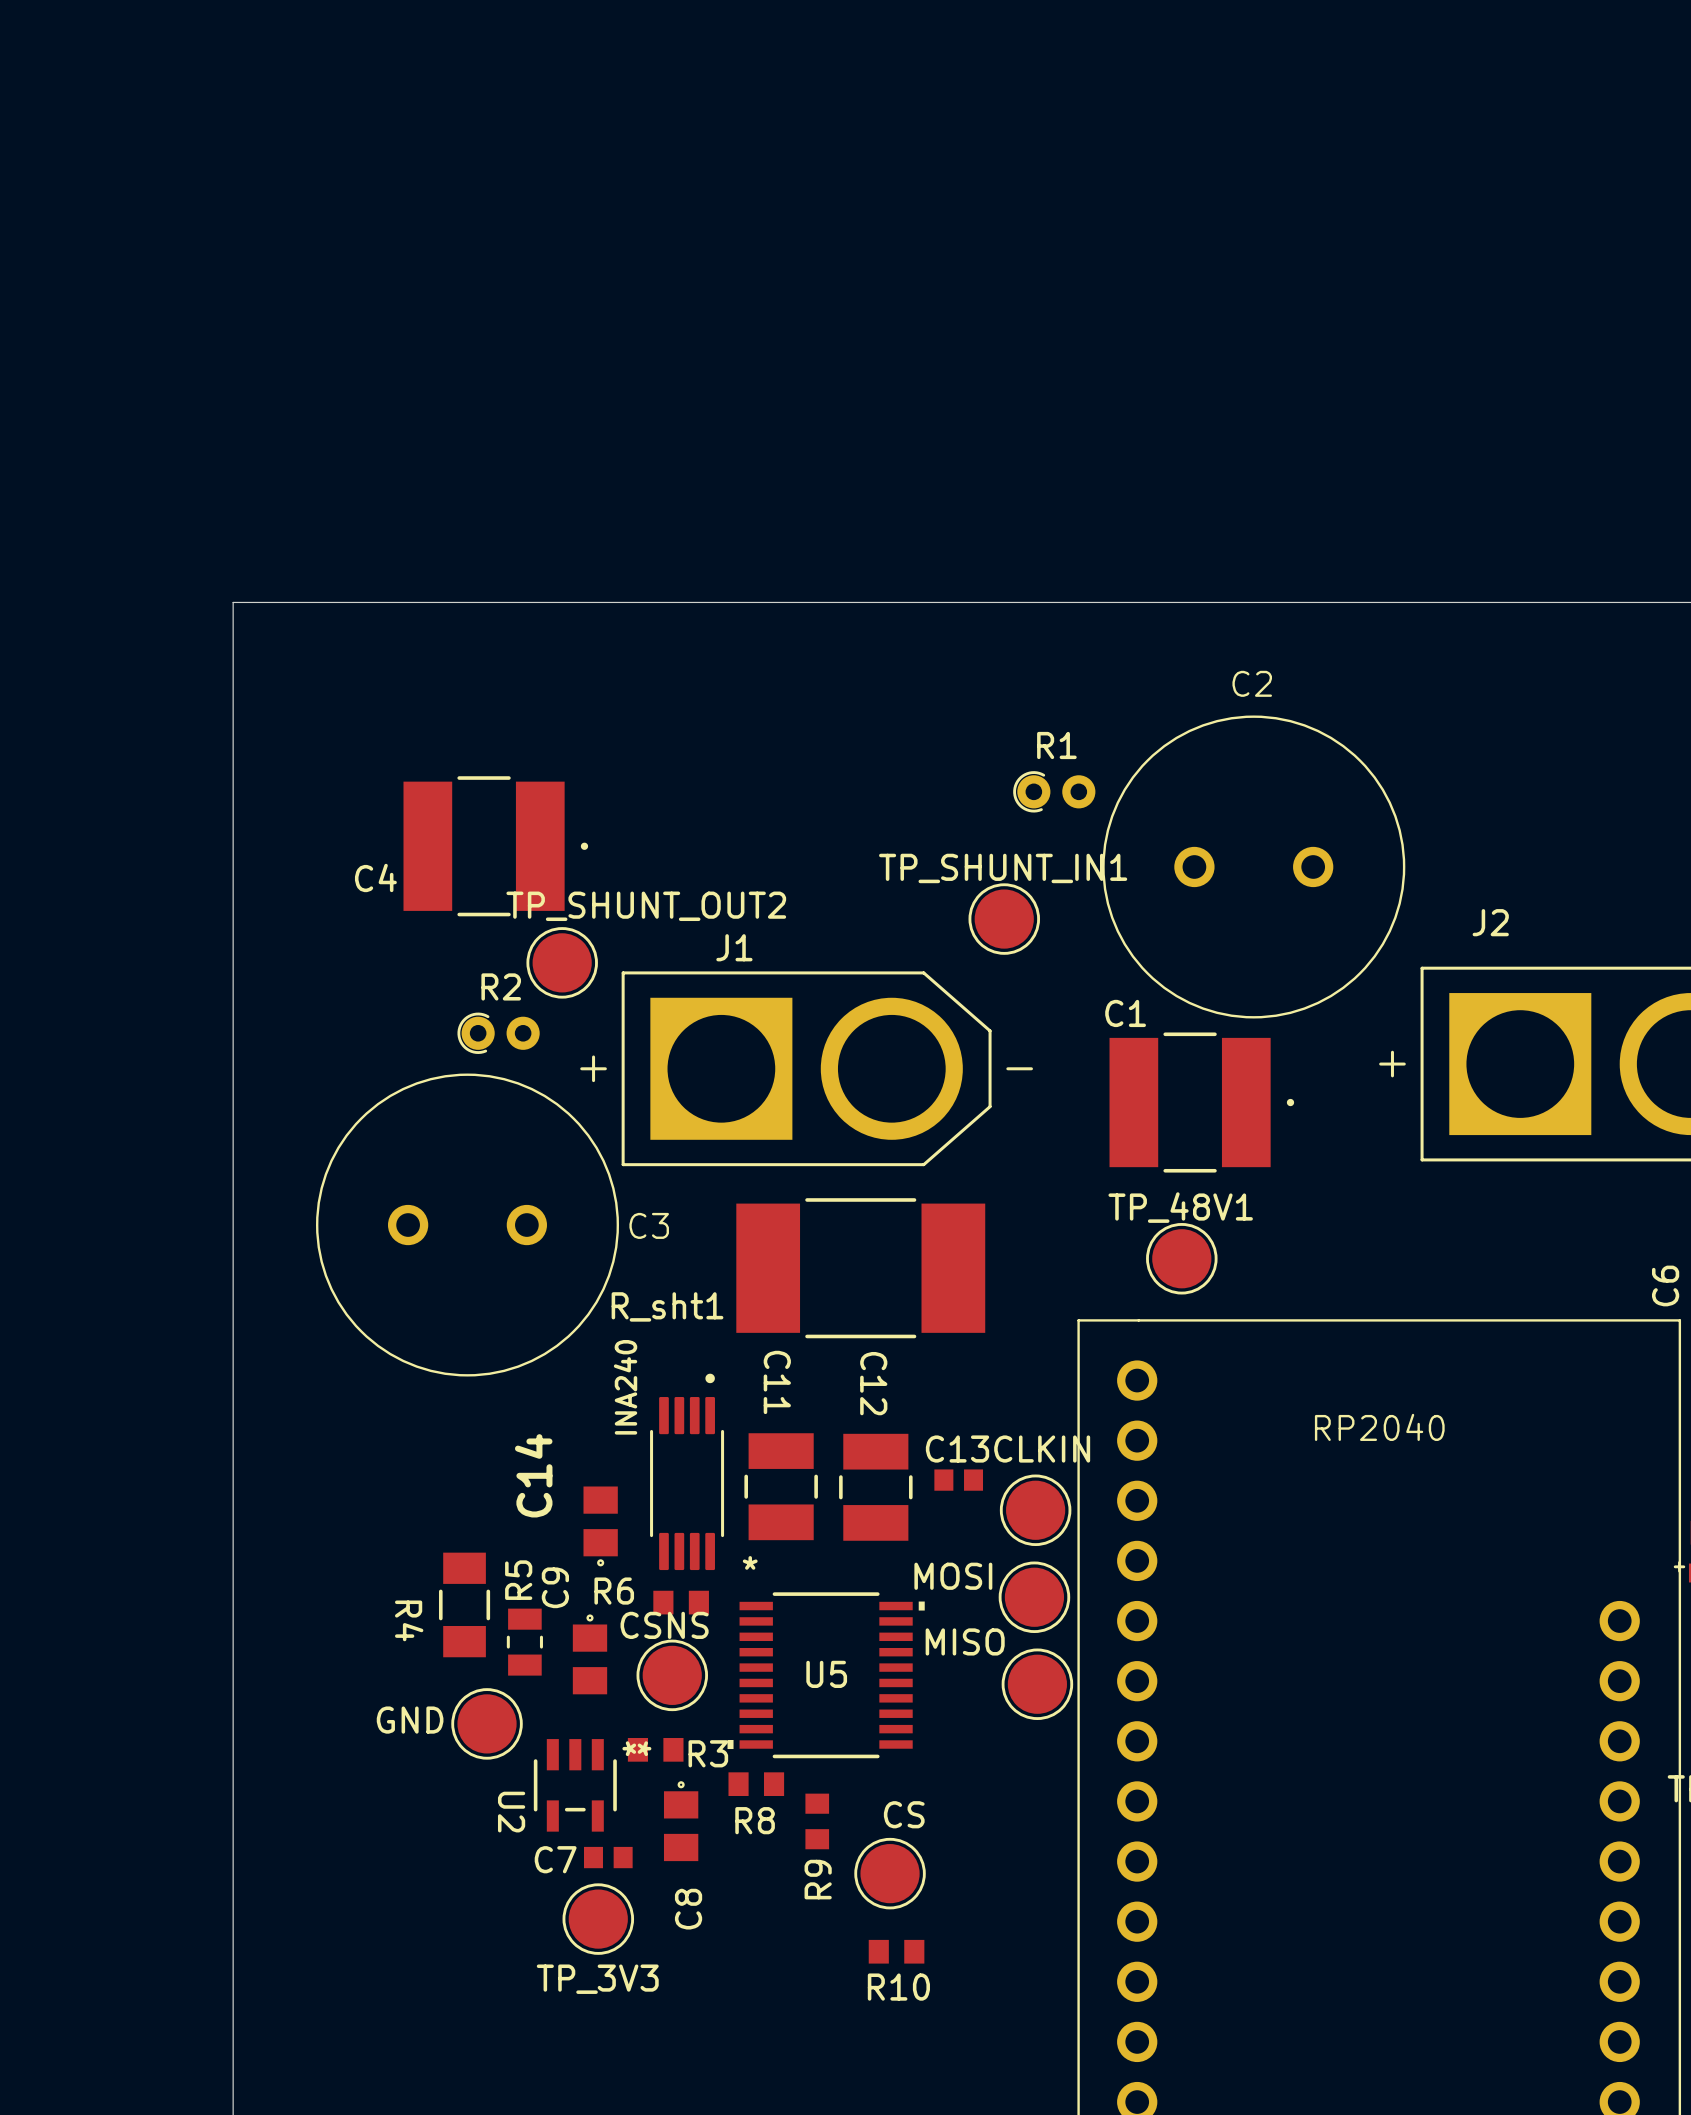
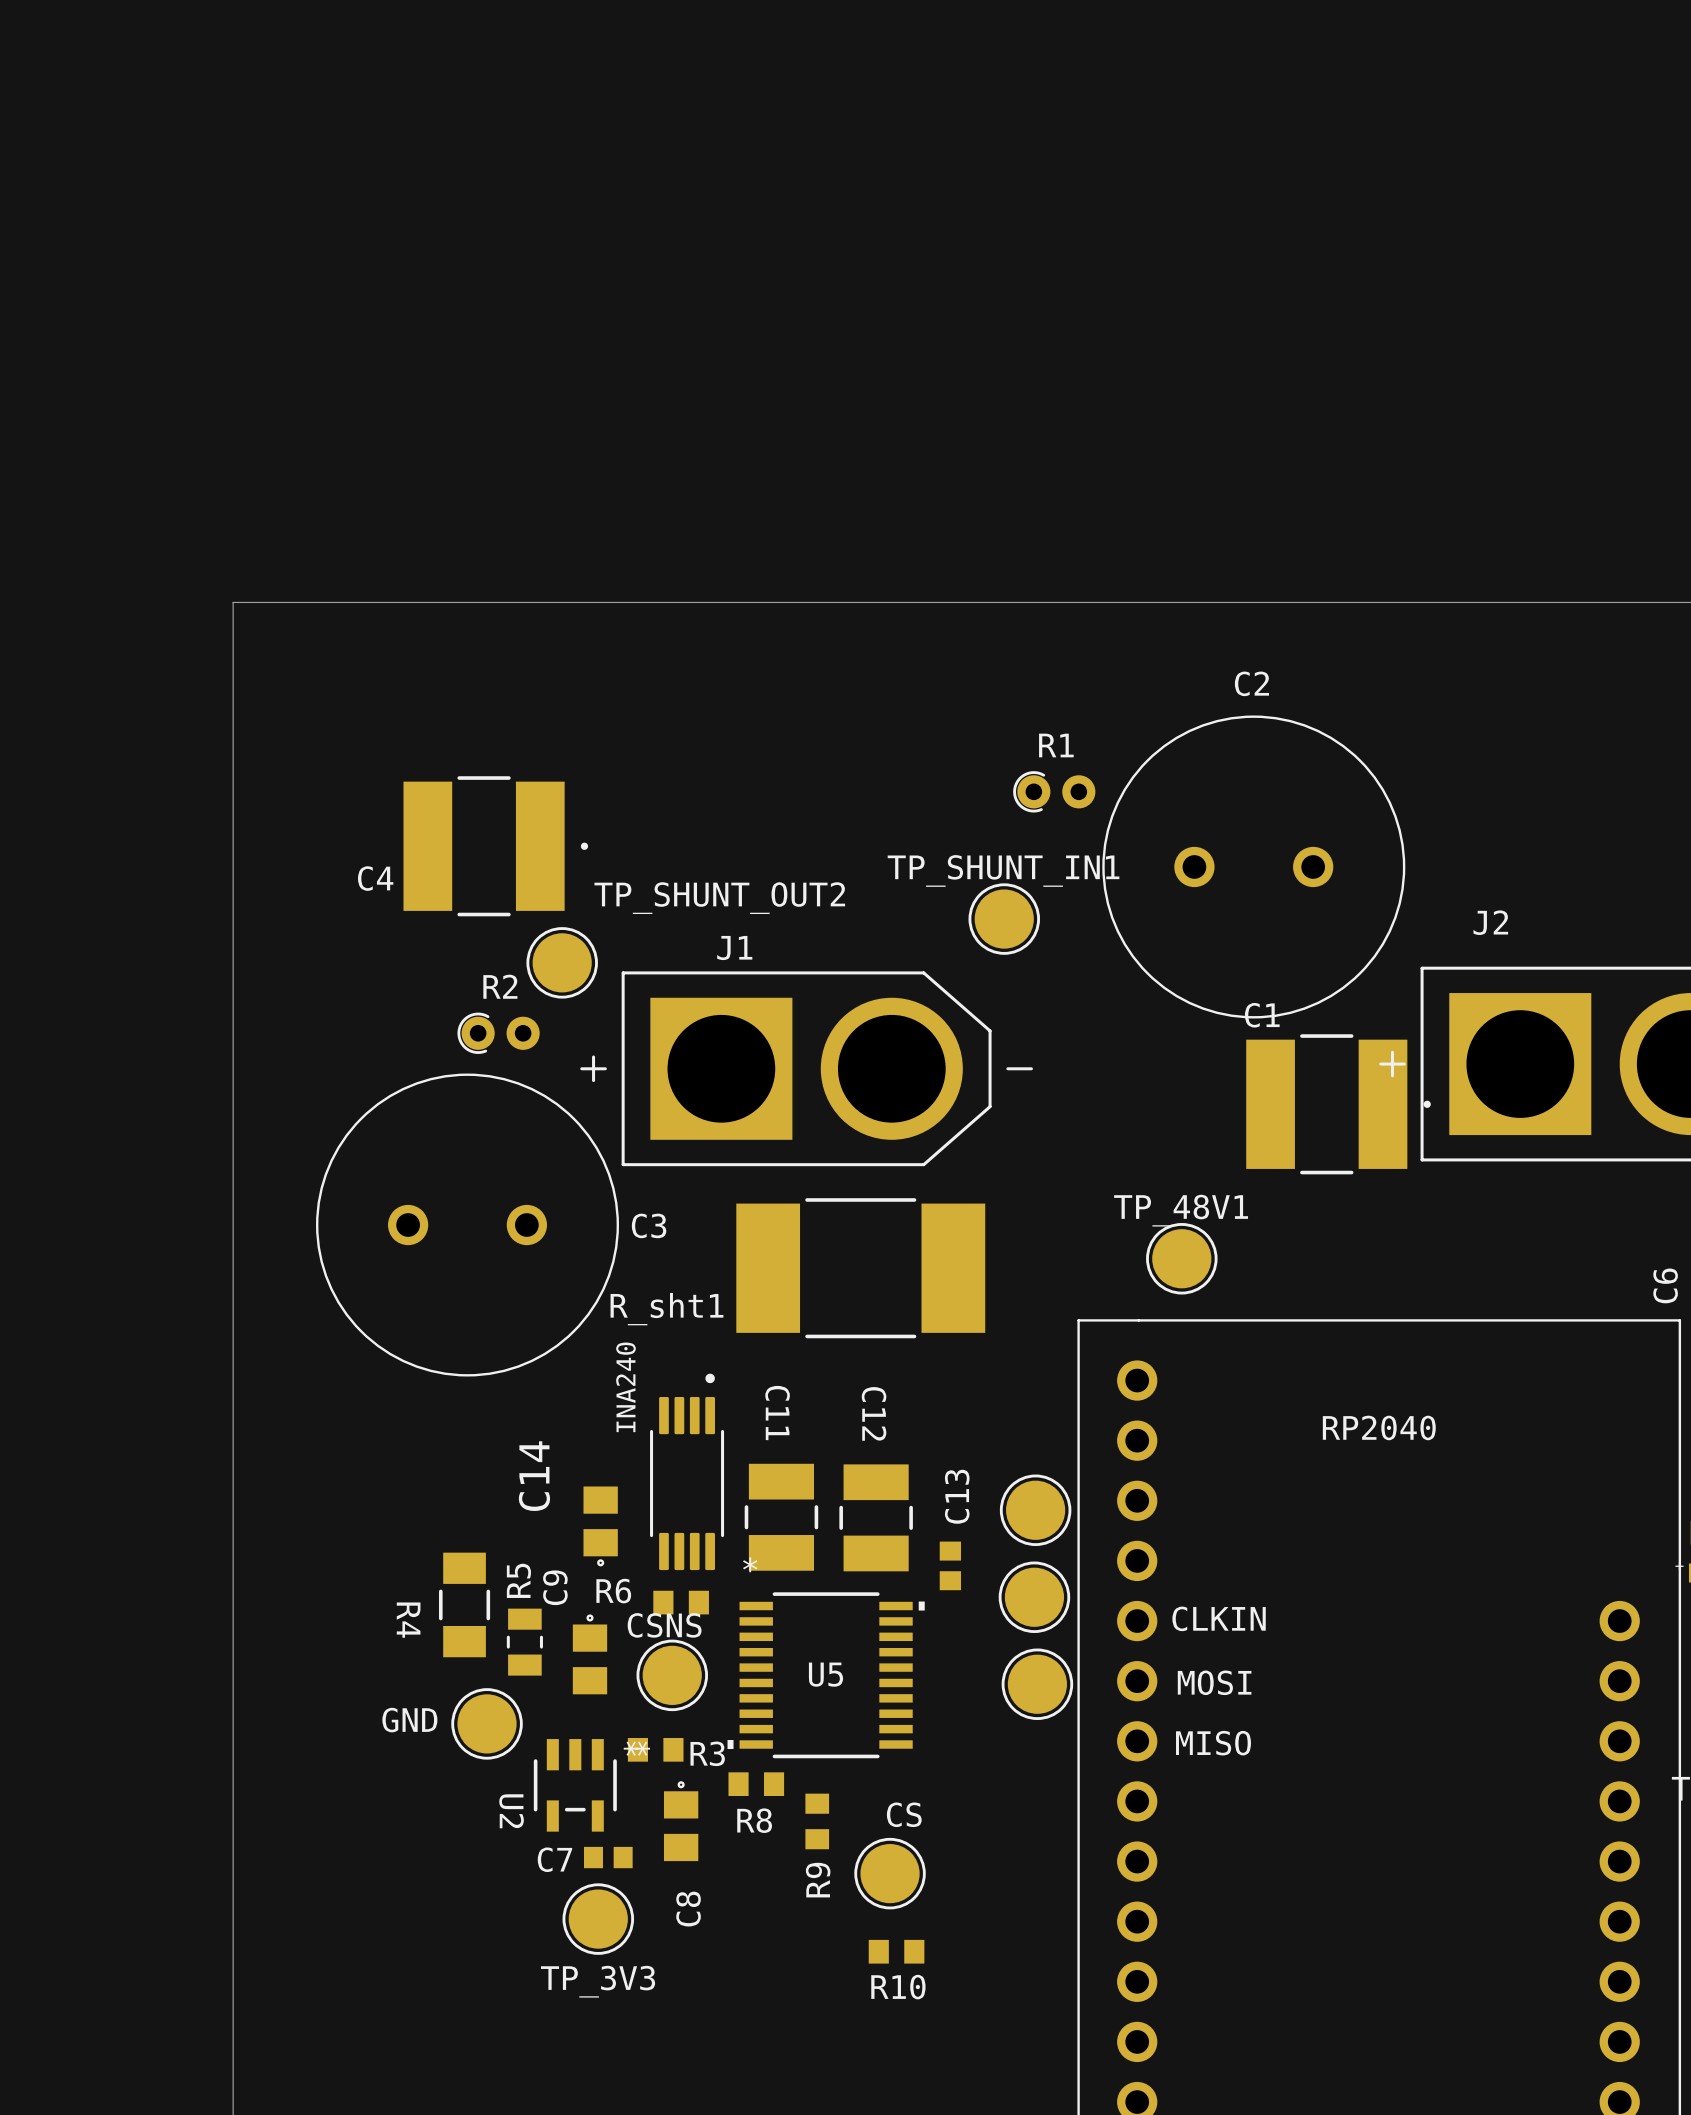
TP_SHUNT_OUT2 name position: TP_SHUNT_OUT2 (646, 906) -> TP_SHUNT_OUT2 (719, 898)
C1 position: (1201, 1102) -> (1338, 1104)
CLKIN name position: CLKIN (1042, 1449) -> CLKIN (1219, 1618)
C13 rotation: 0° (958, 1480) -> 90° clockwise (950, 1565)
C13 position: (958, 1480) -> (950, 1565)
C11 position: (781, 1486) -> (781, 1517)
C12 position: (875, 1487) -> (876, 1517)
MOSI name position: MOSI (953, 1576) -> MOSI (1214, 1682)
MISO name position: MISO (965, 1641) -> MISO (1213, 1743)

